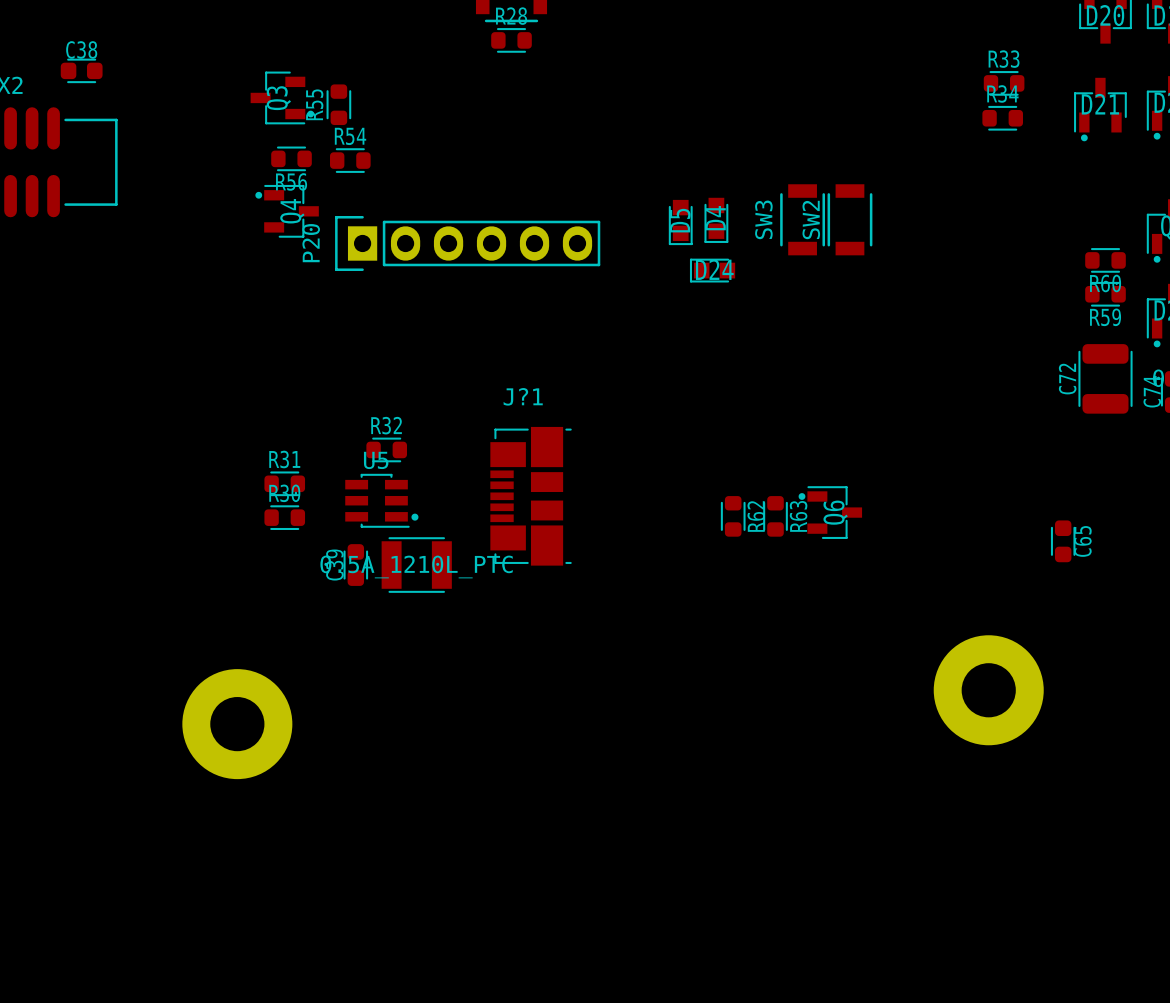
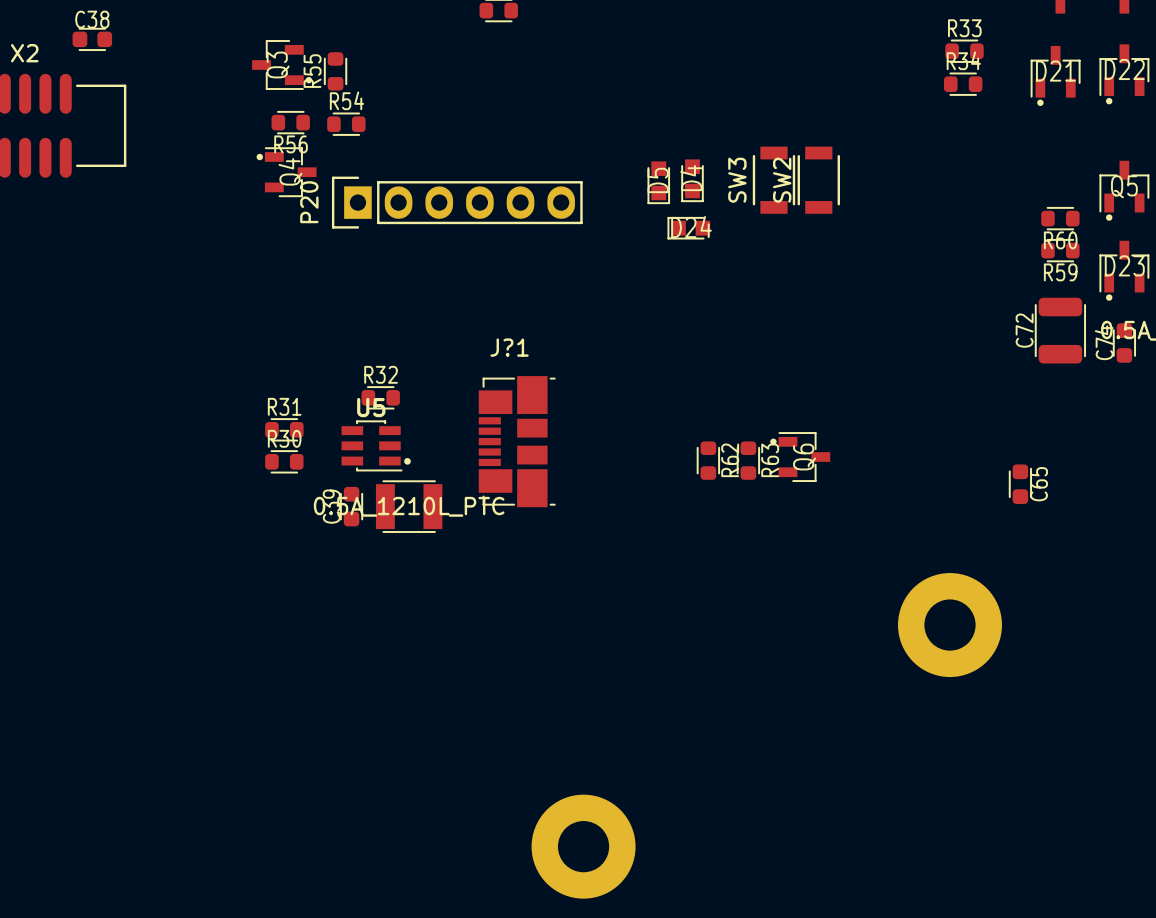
part position: (237, 724) -> (583, 846)

